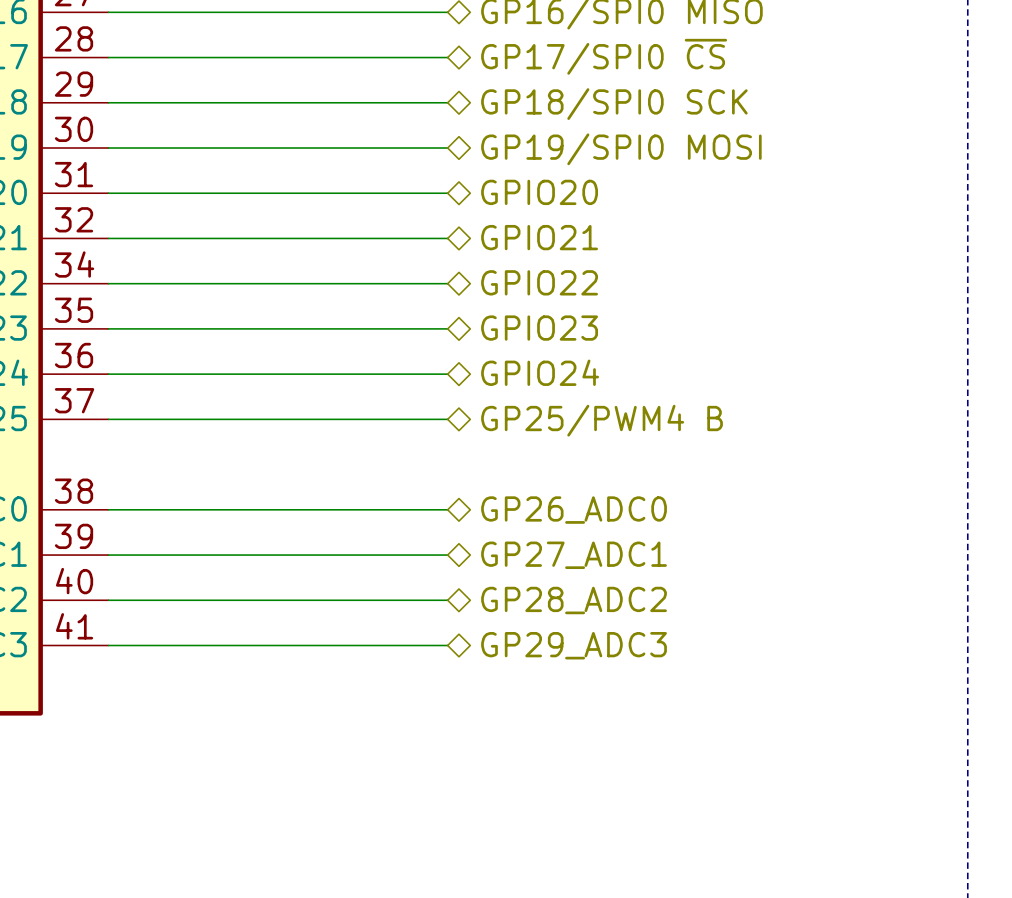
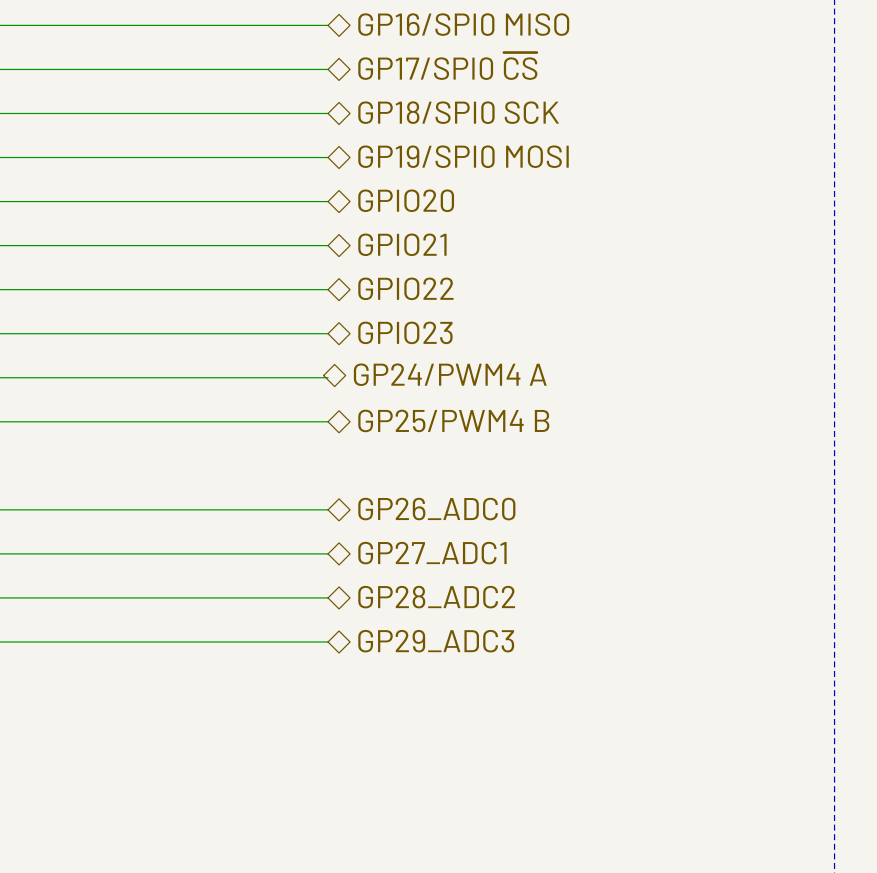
hierarchical label: GPIO24 (540, 372) -> GP24/PWM4 A (450, 374)

